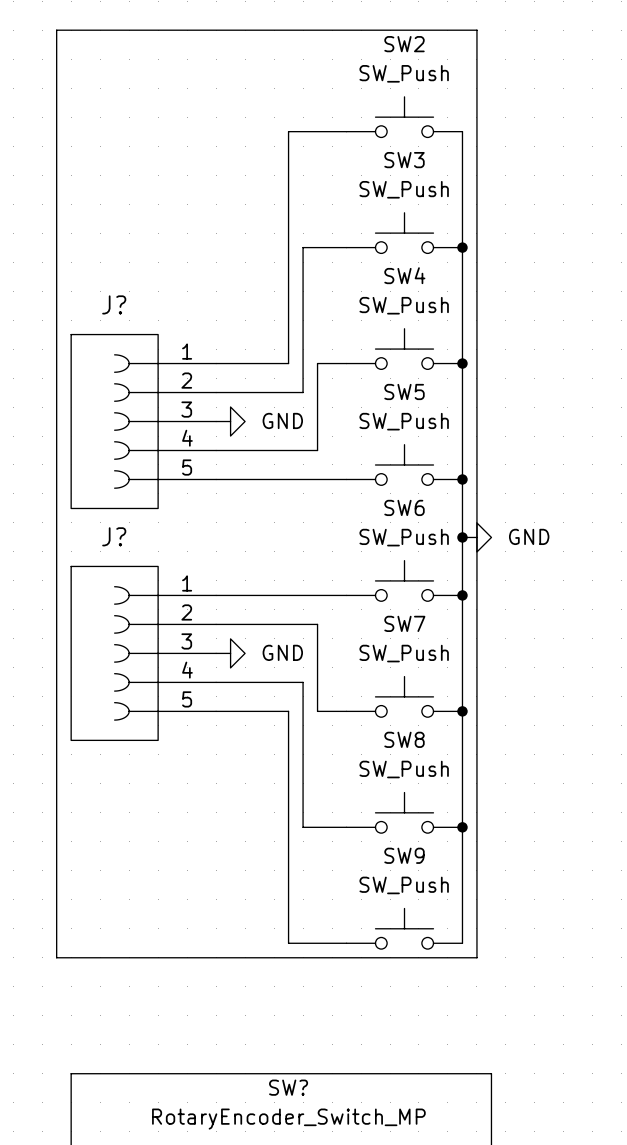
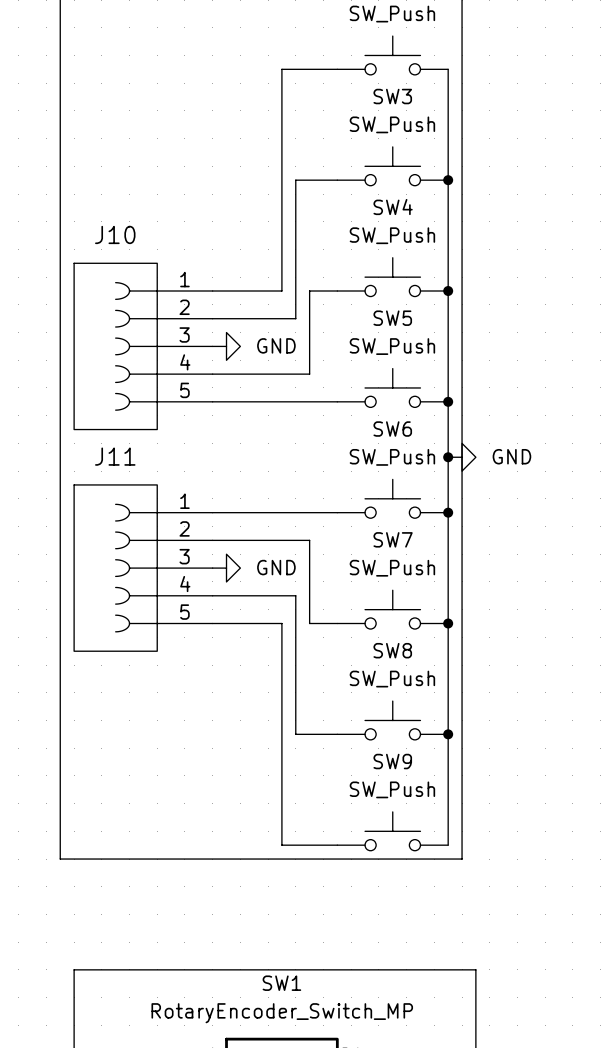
J? name: J? (114, 304) -> J10 (115, 234)
J? name: J? (114, 536) -> J11 (115, 456)
SW? name: SW? (288, 1087) -> SW1 (281, 983)

